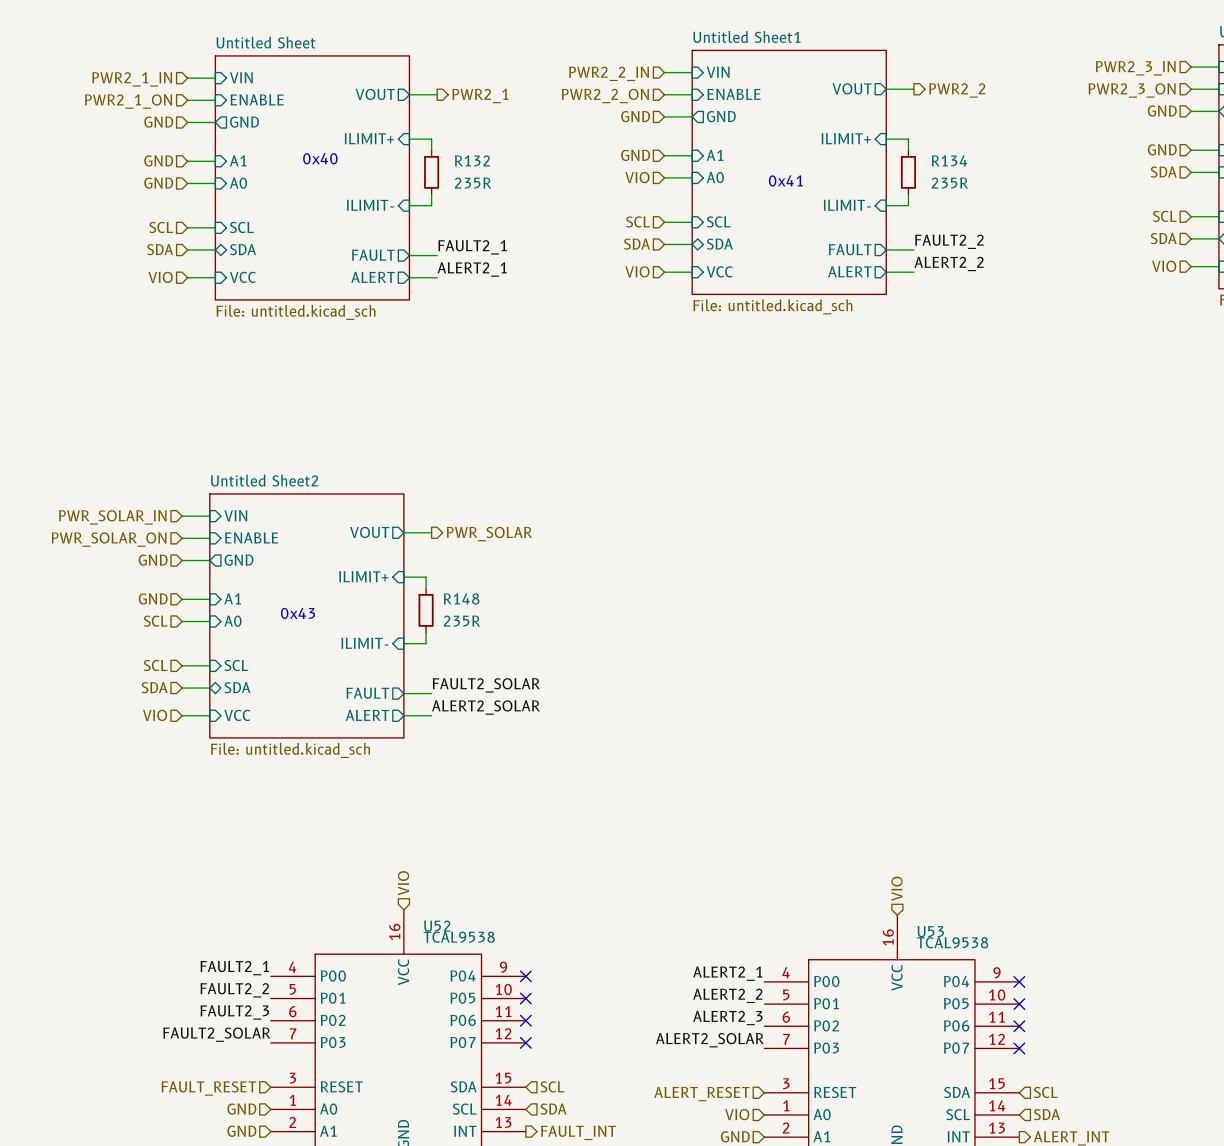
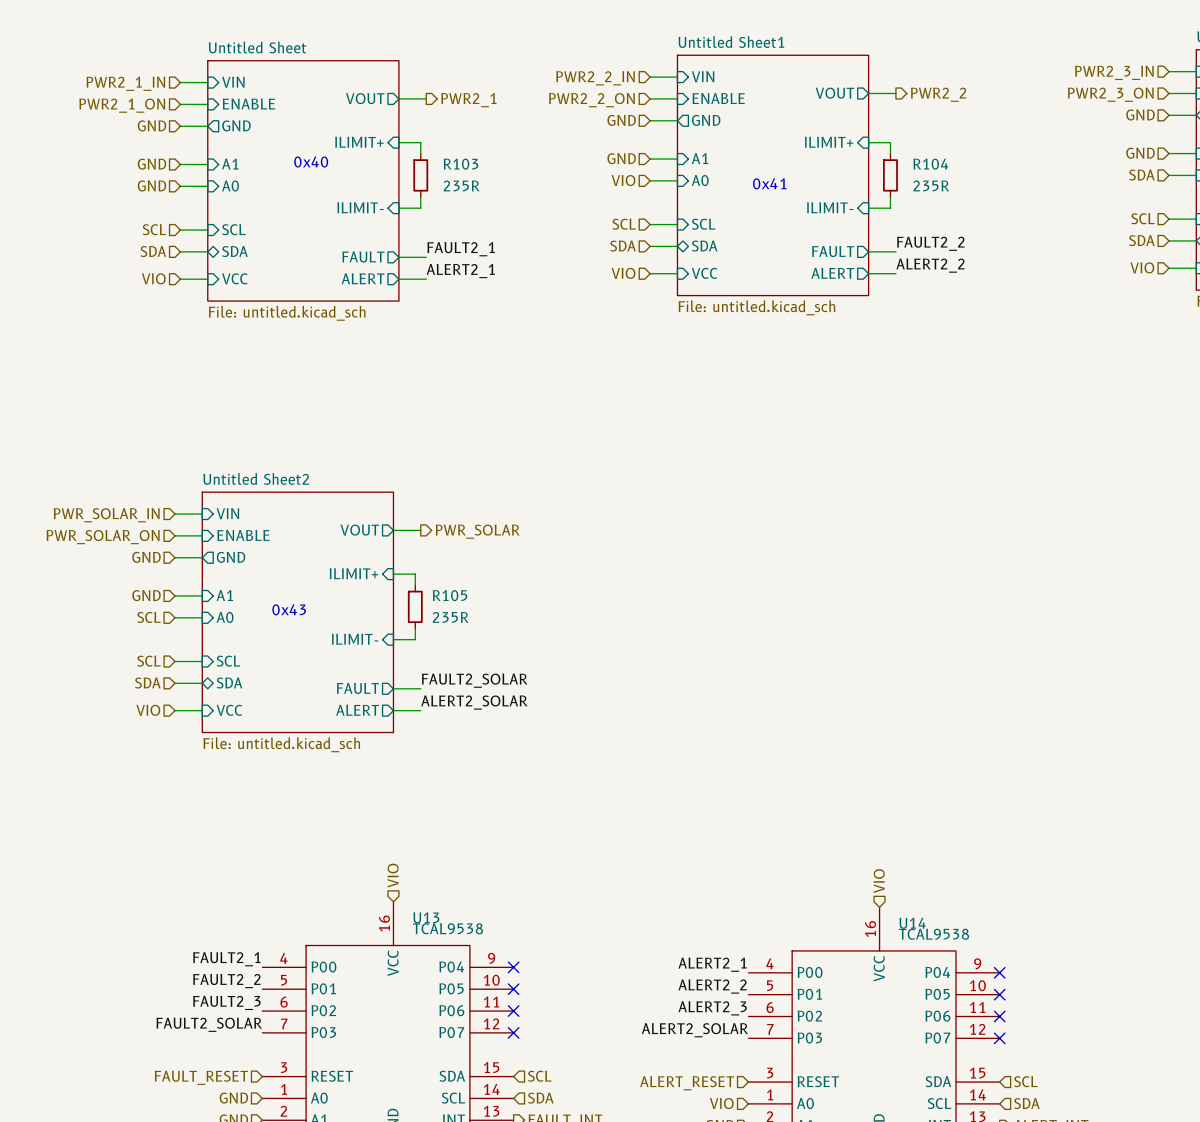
R132 name: R132 (472, 160) -> R103 (460, 164)
R134 name: R134 (949, 160) -> R104 (930, 164)
R148 name: R148 (461, 598) -> R105 (450, 595)
U52 name: U52 (437, 926) -> U13 (426, 917)
U53 name: U53 (930, 931) -> U14 (912, 923)

